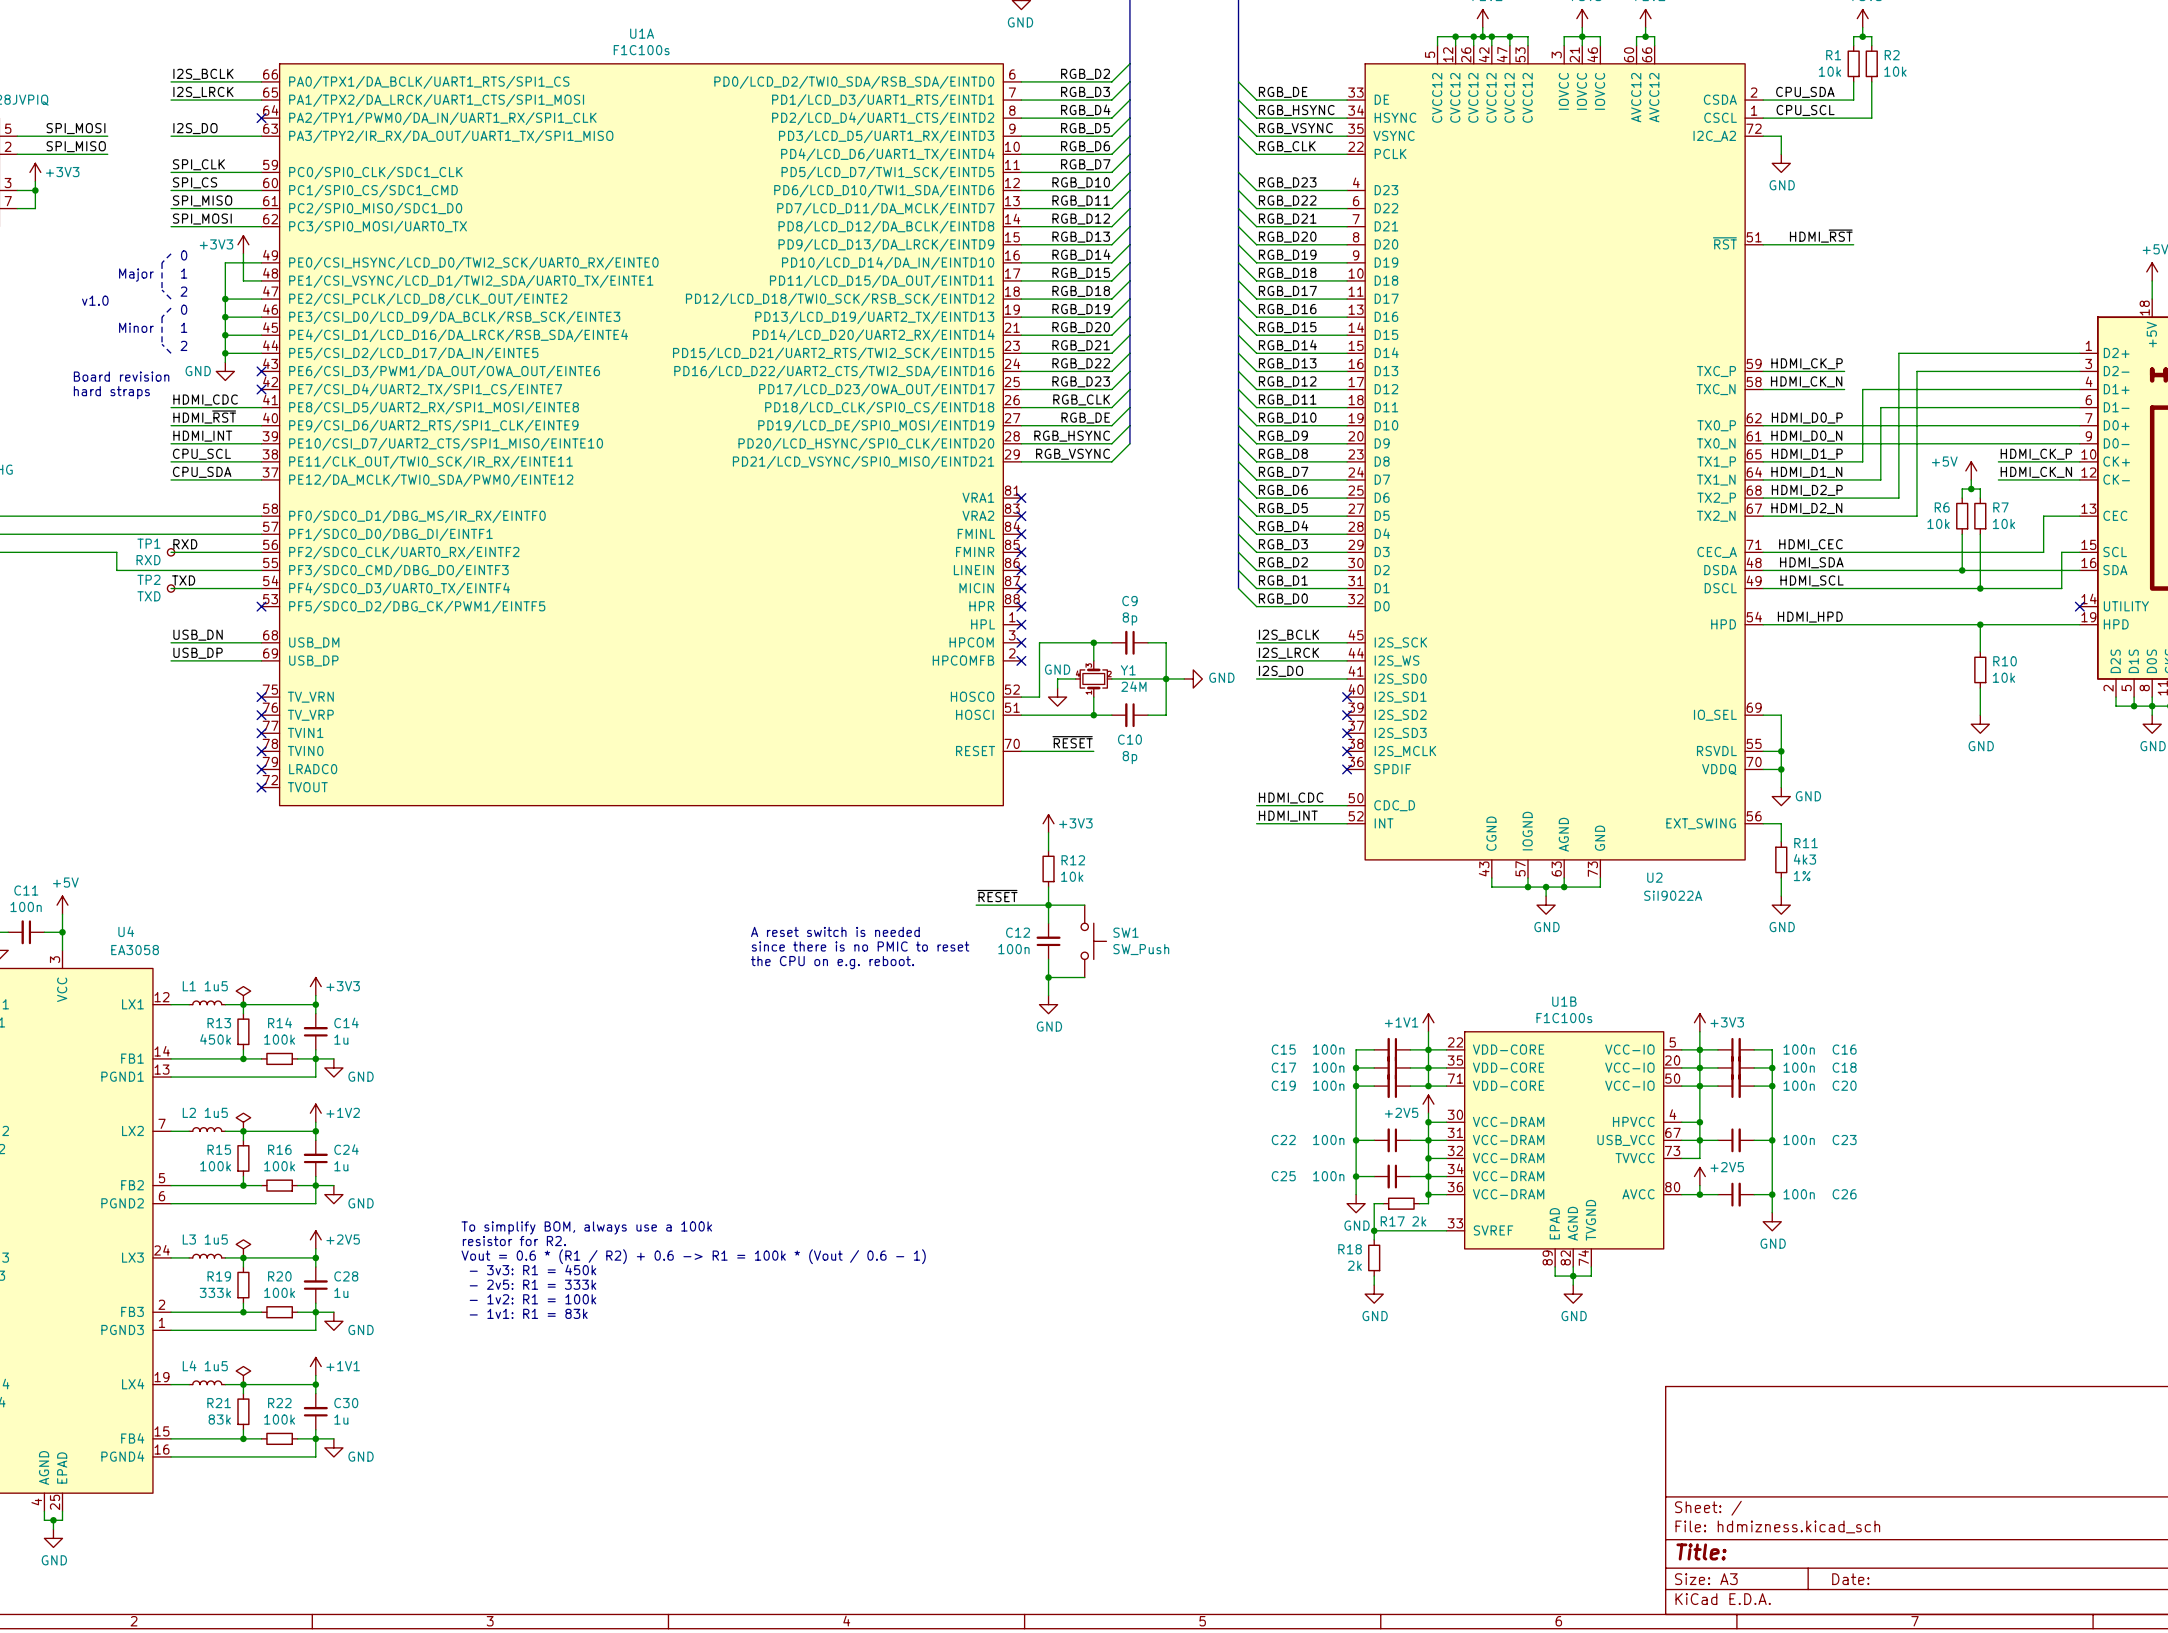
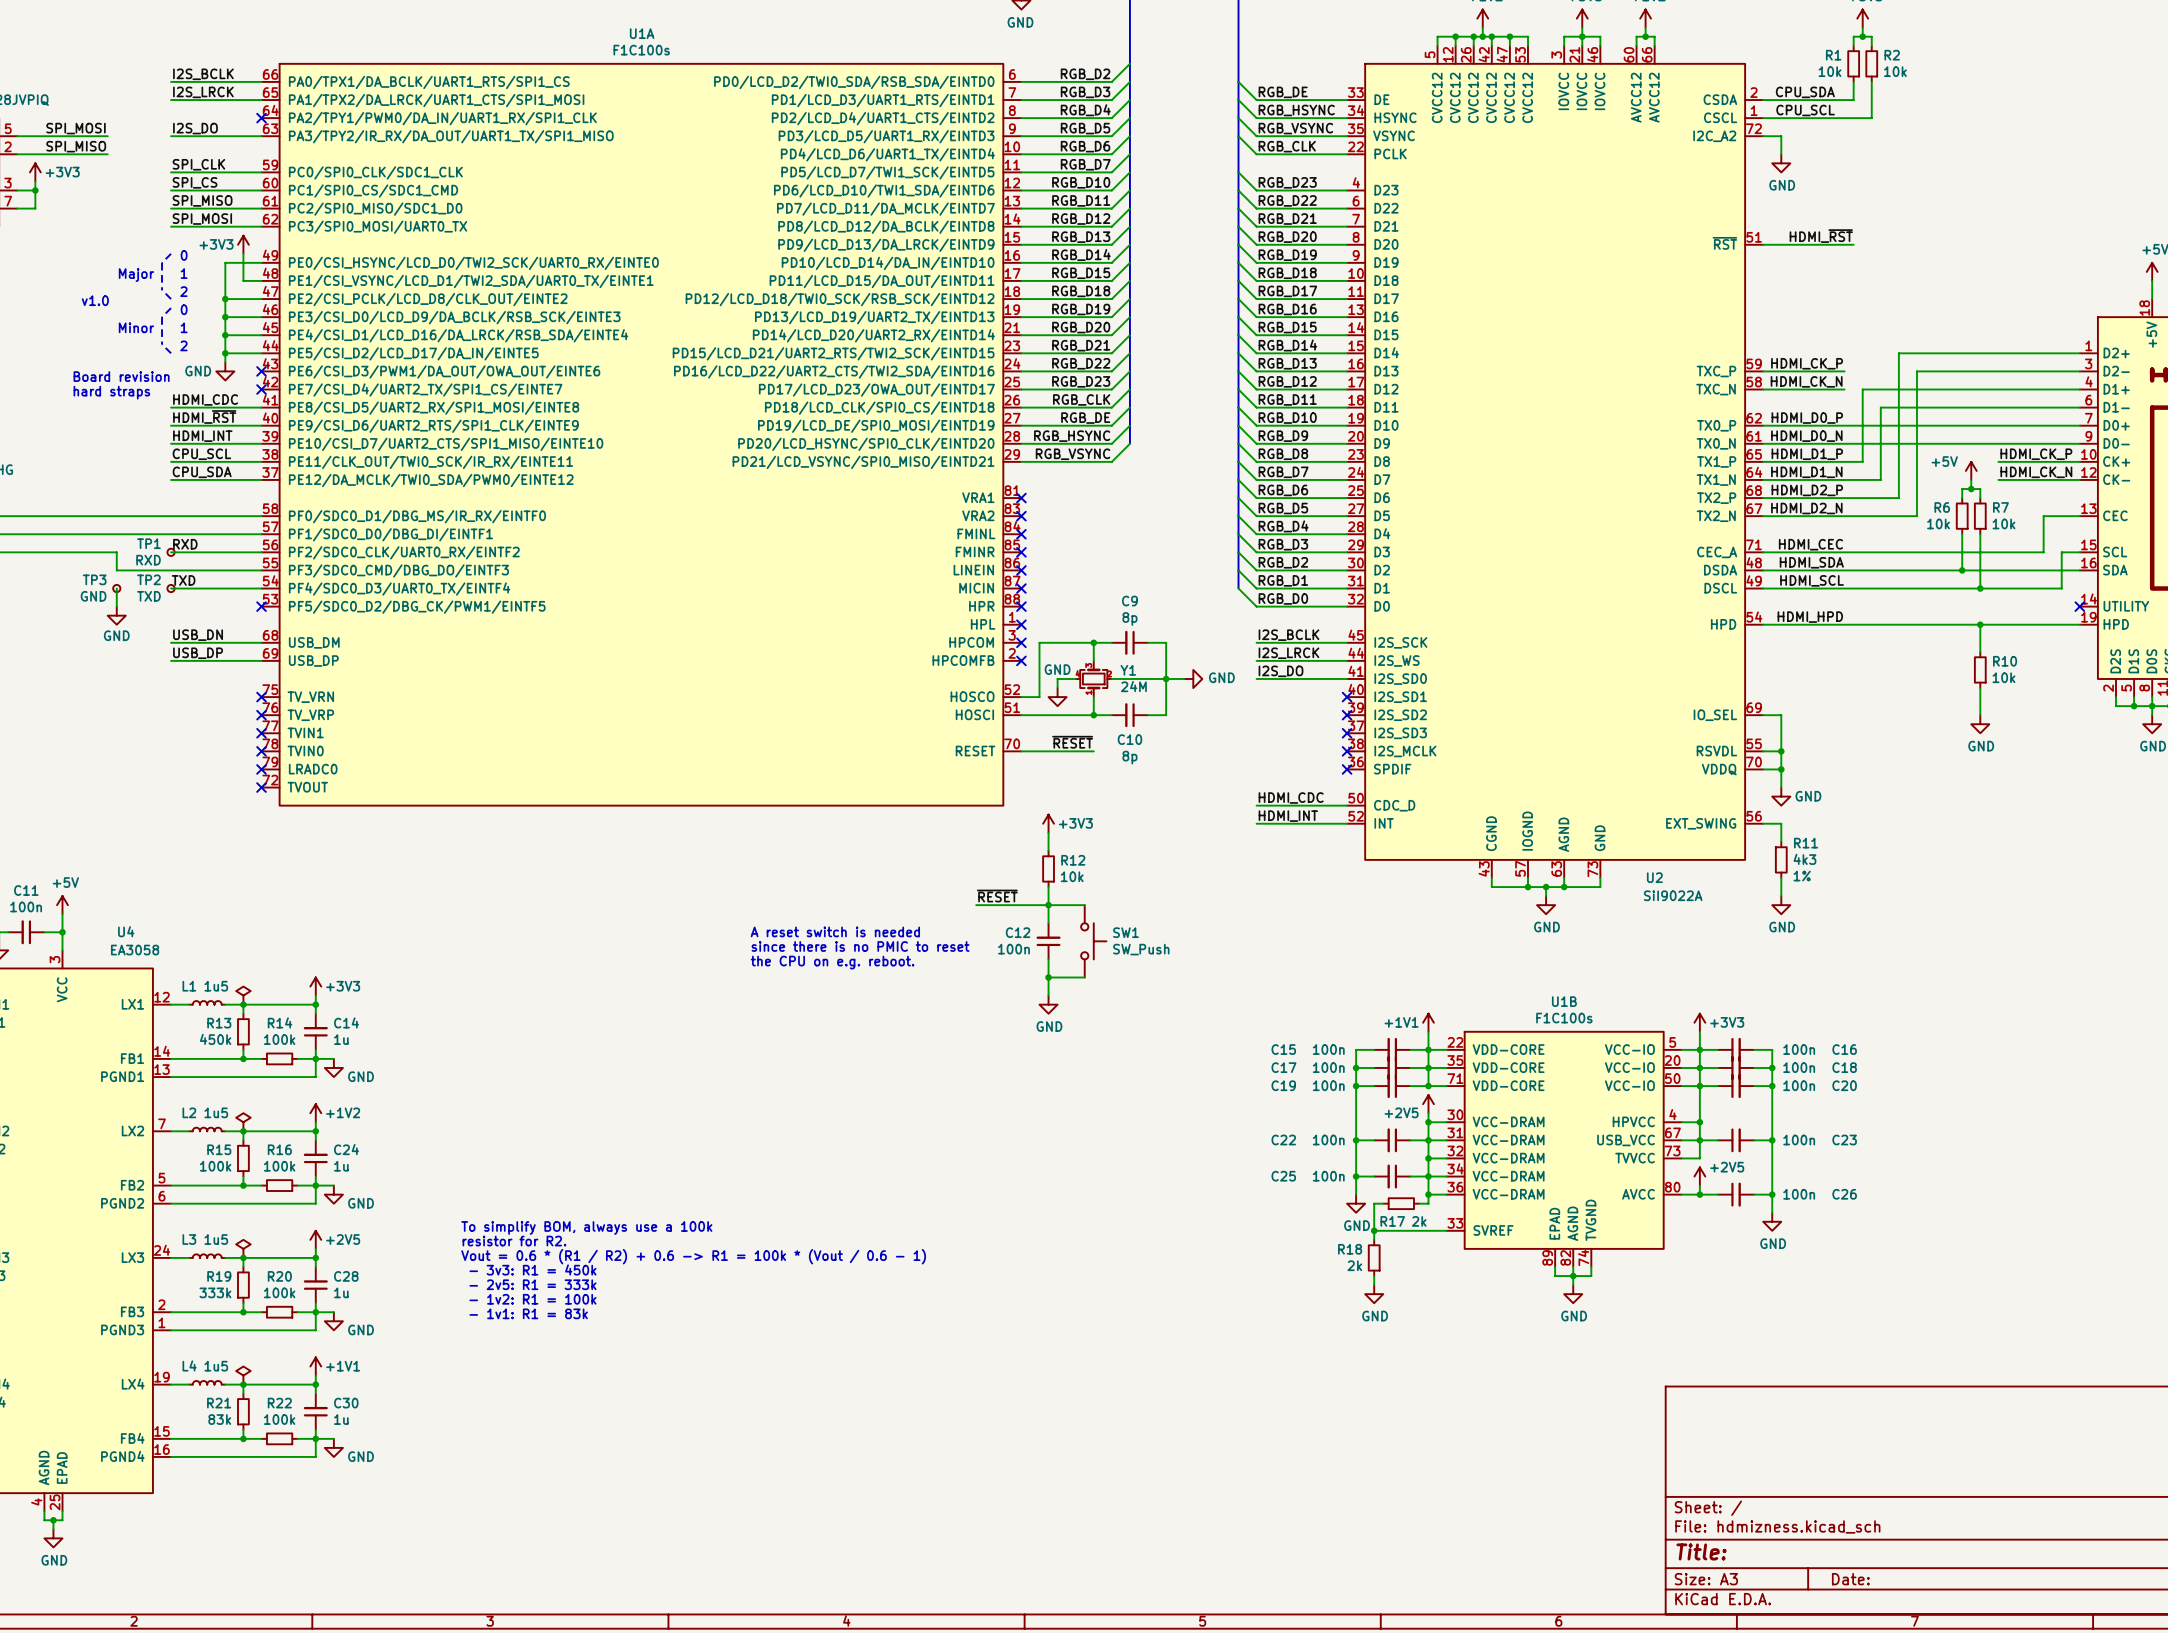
wire: none -> (116, 588) (116, 606)
TP3: none -> GND (116, 588)
power symbol: none -> GND (116, 615)

